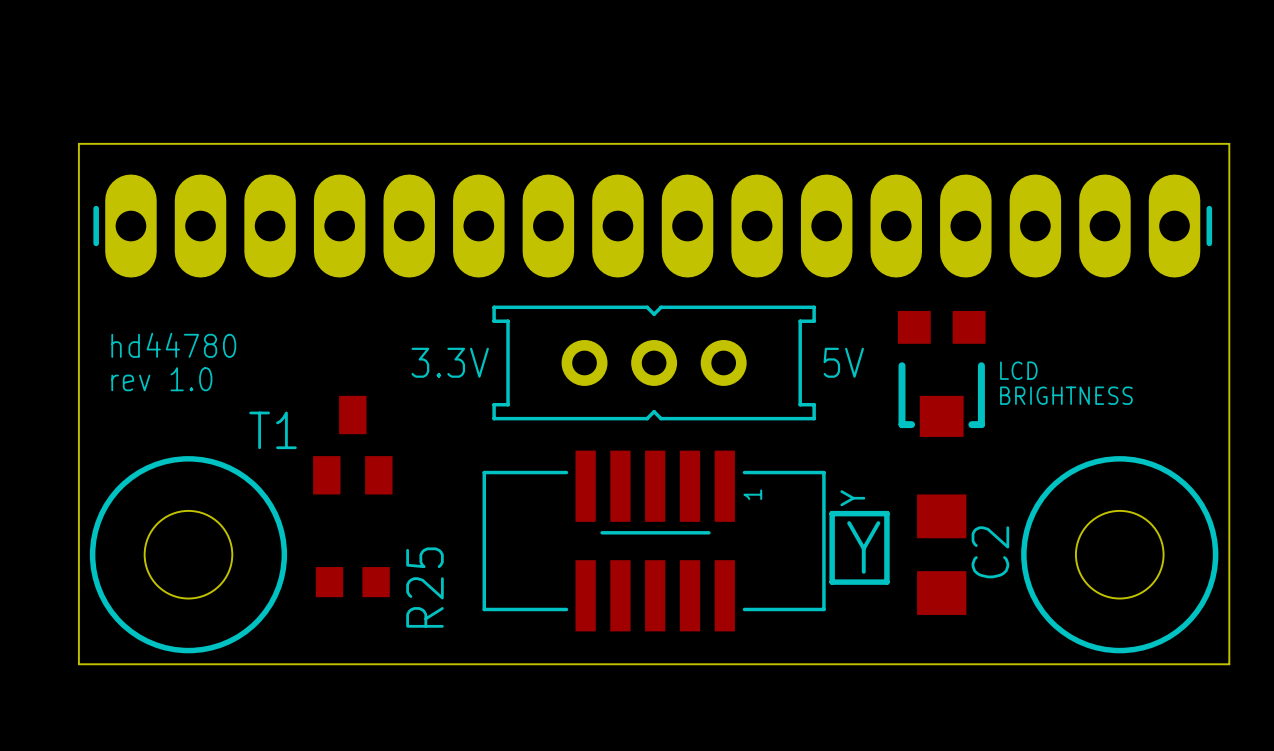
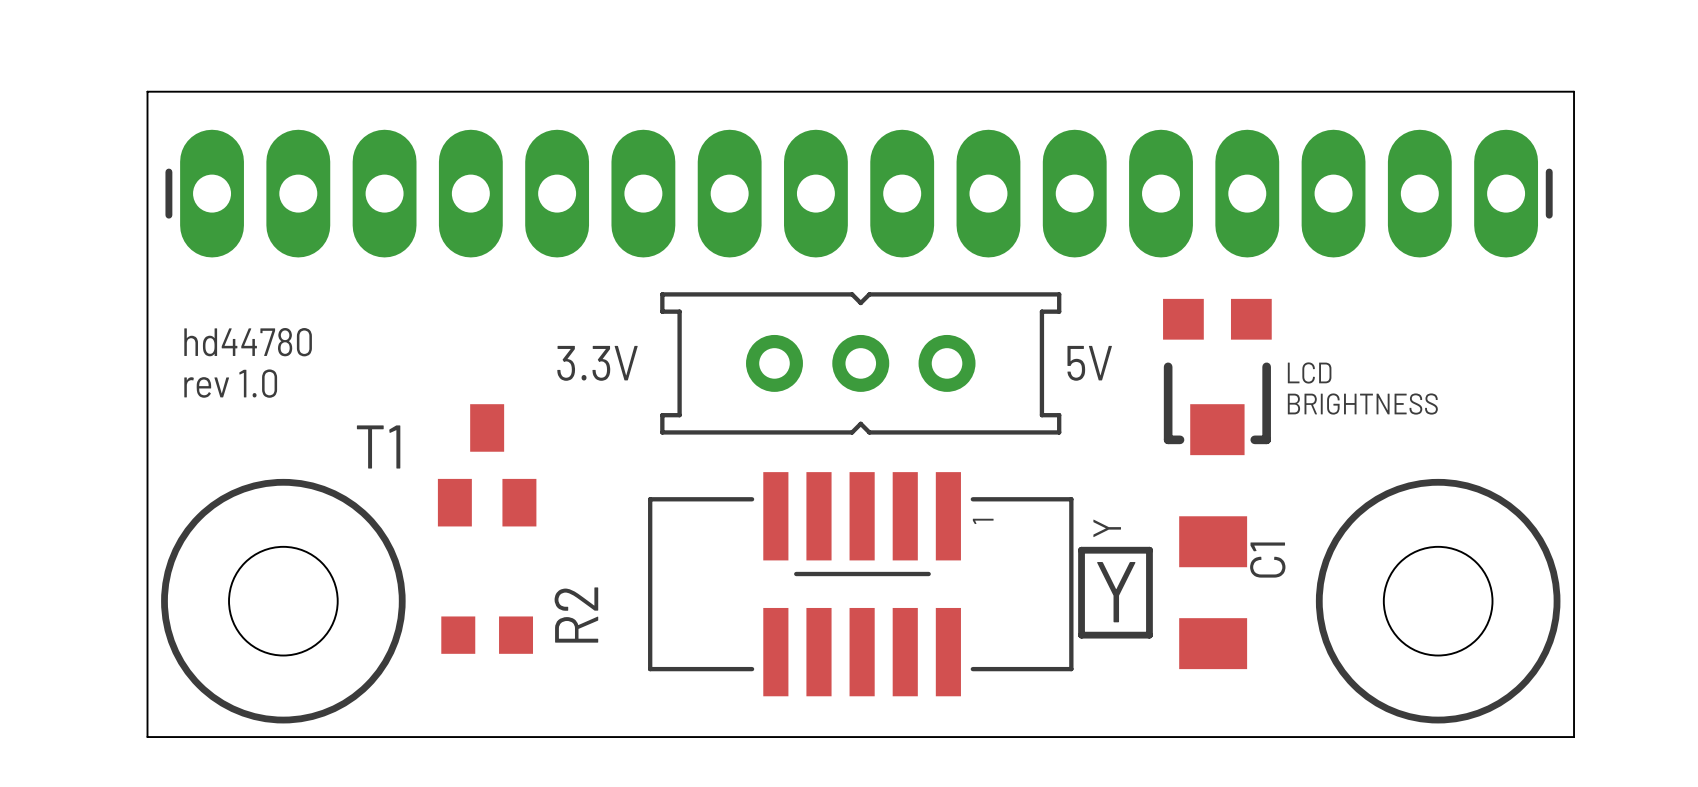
C1: none -> (1213, 592)
C2: (941, 554) -> none
R25 name: R25 (424, 587) -> R2 (576, 615)

